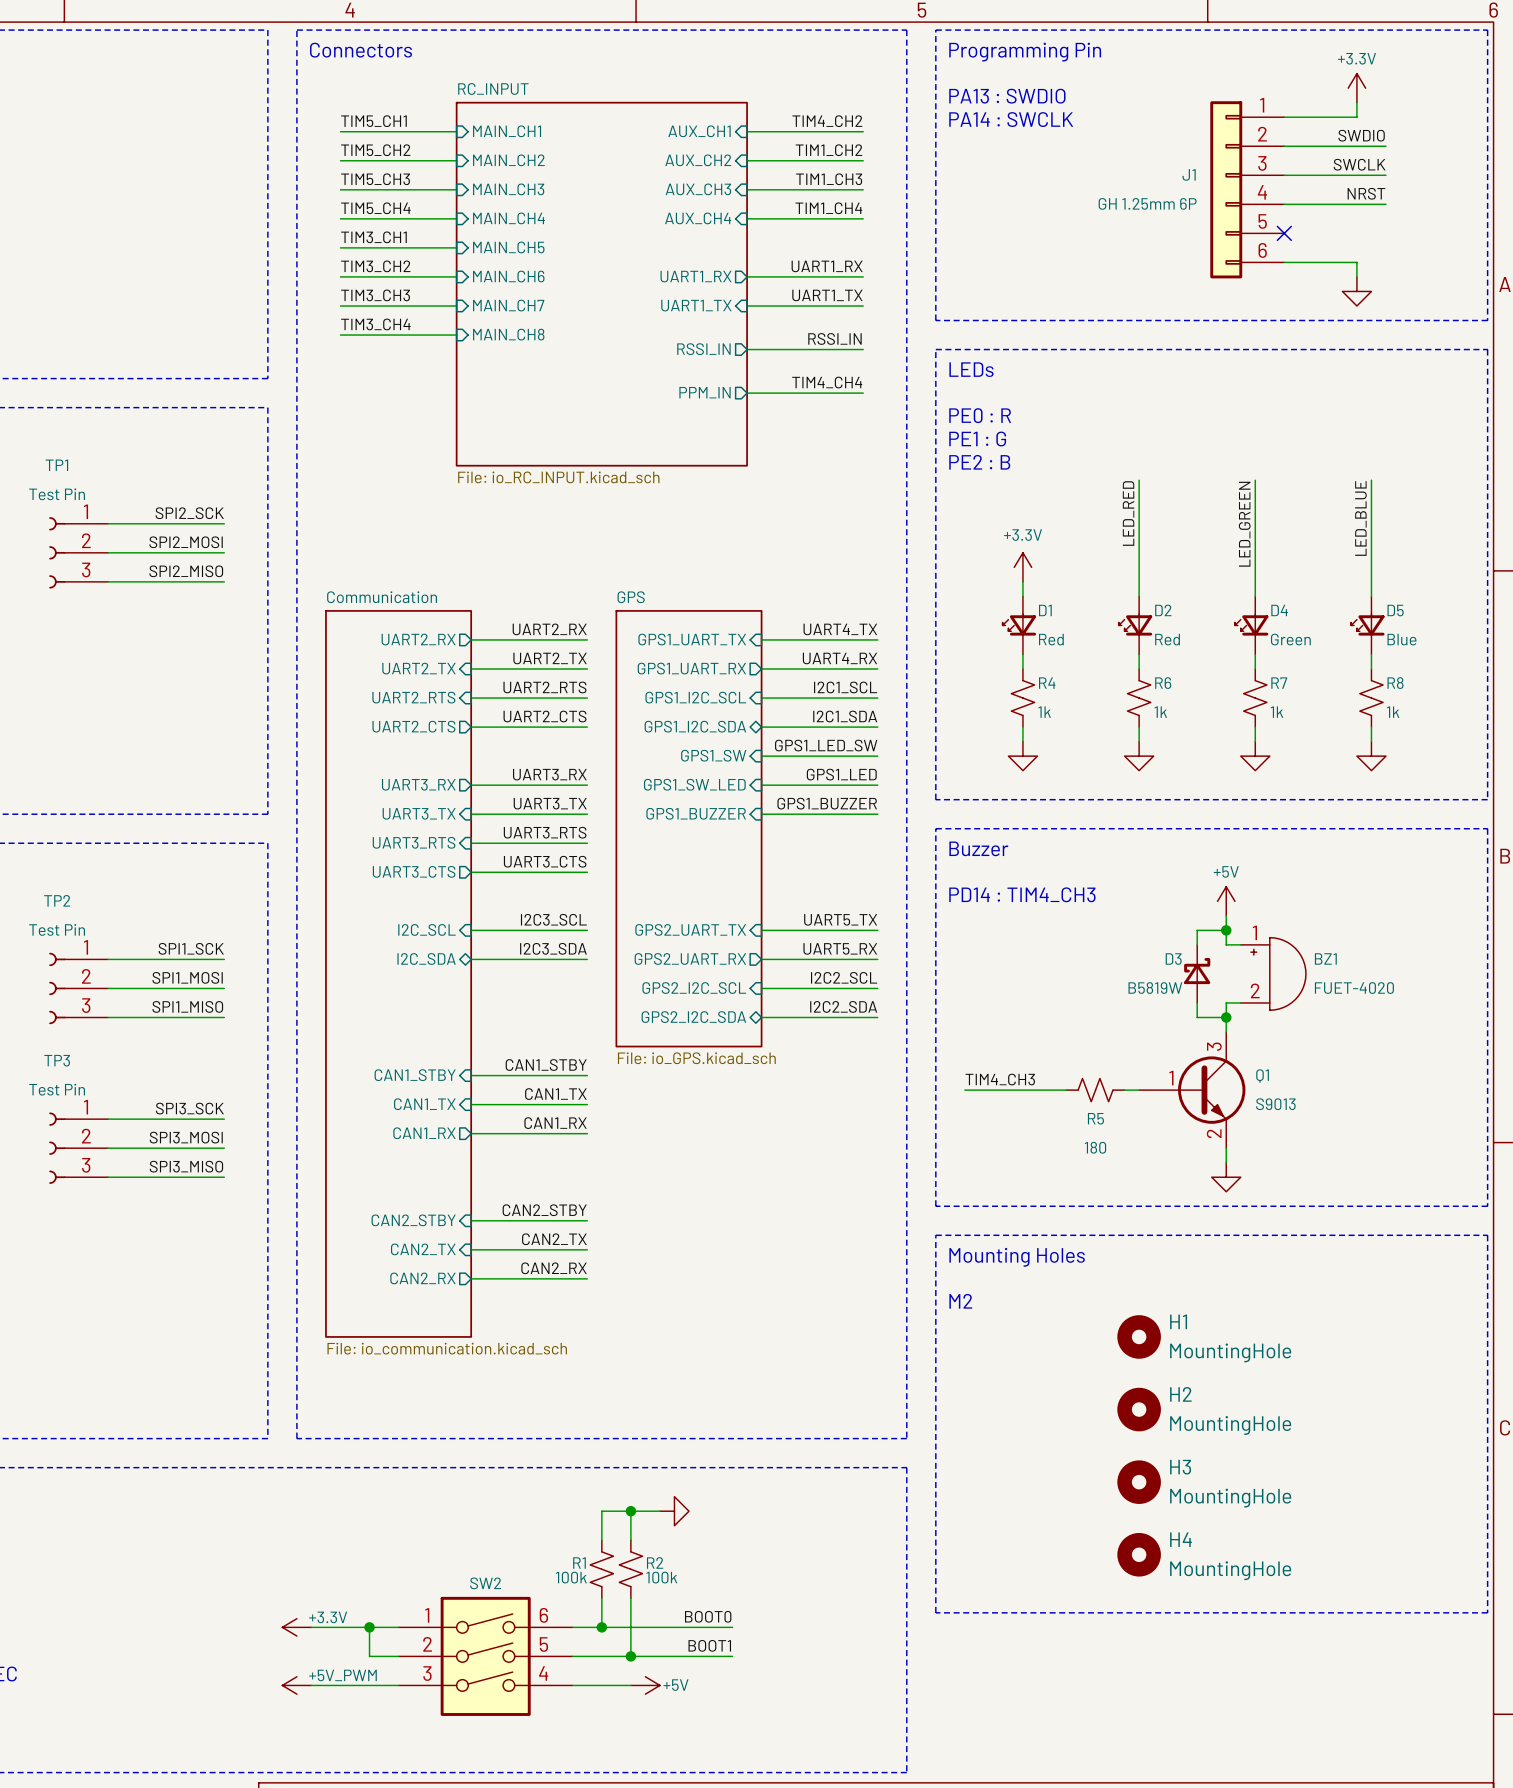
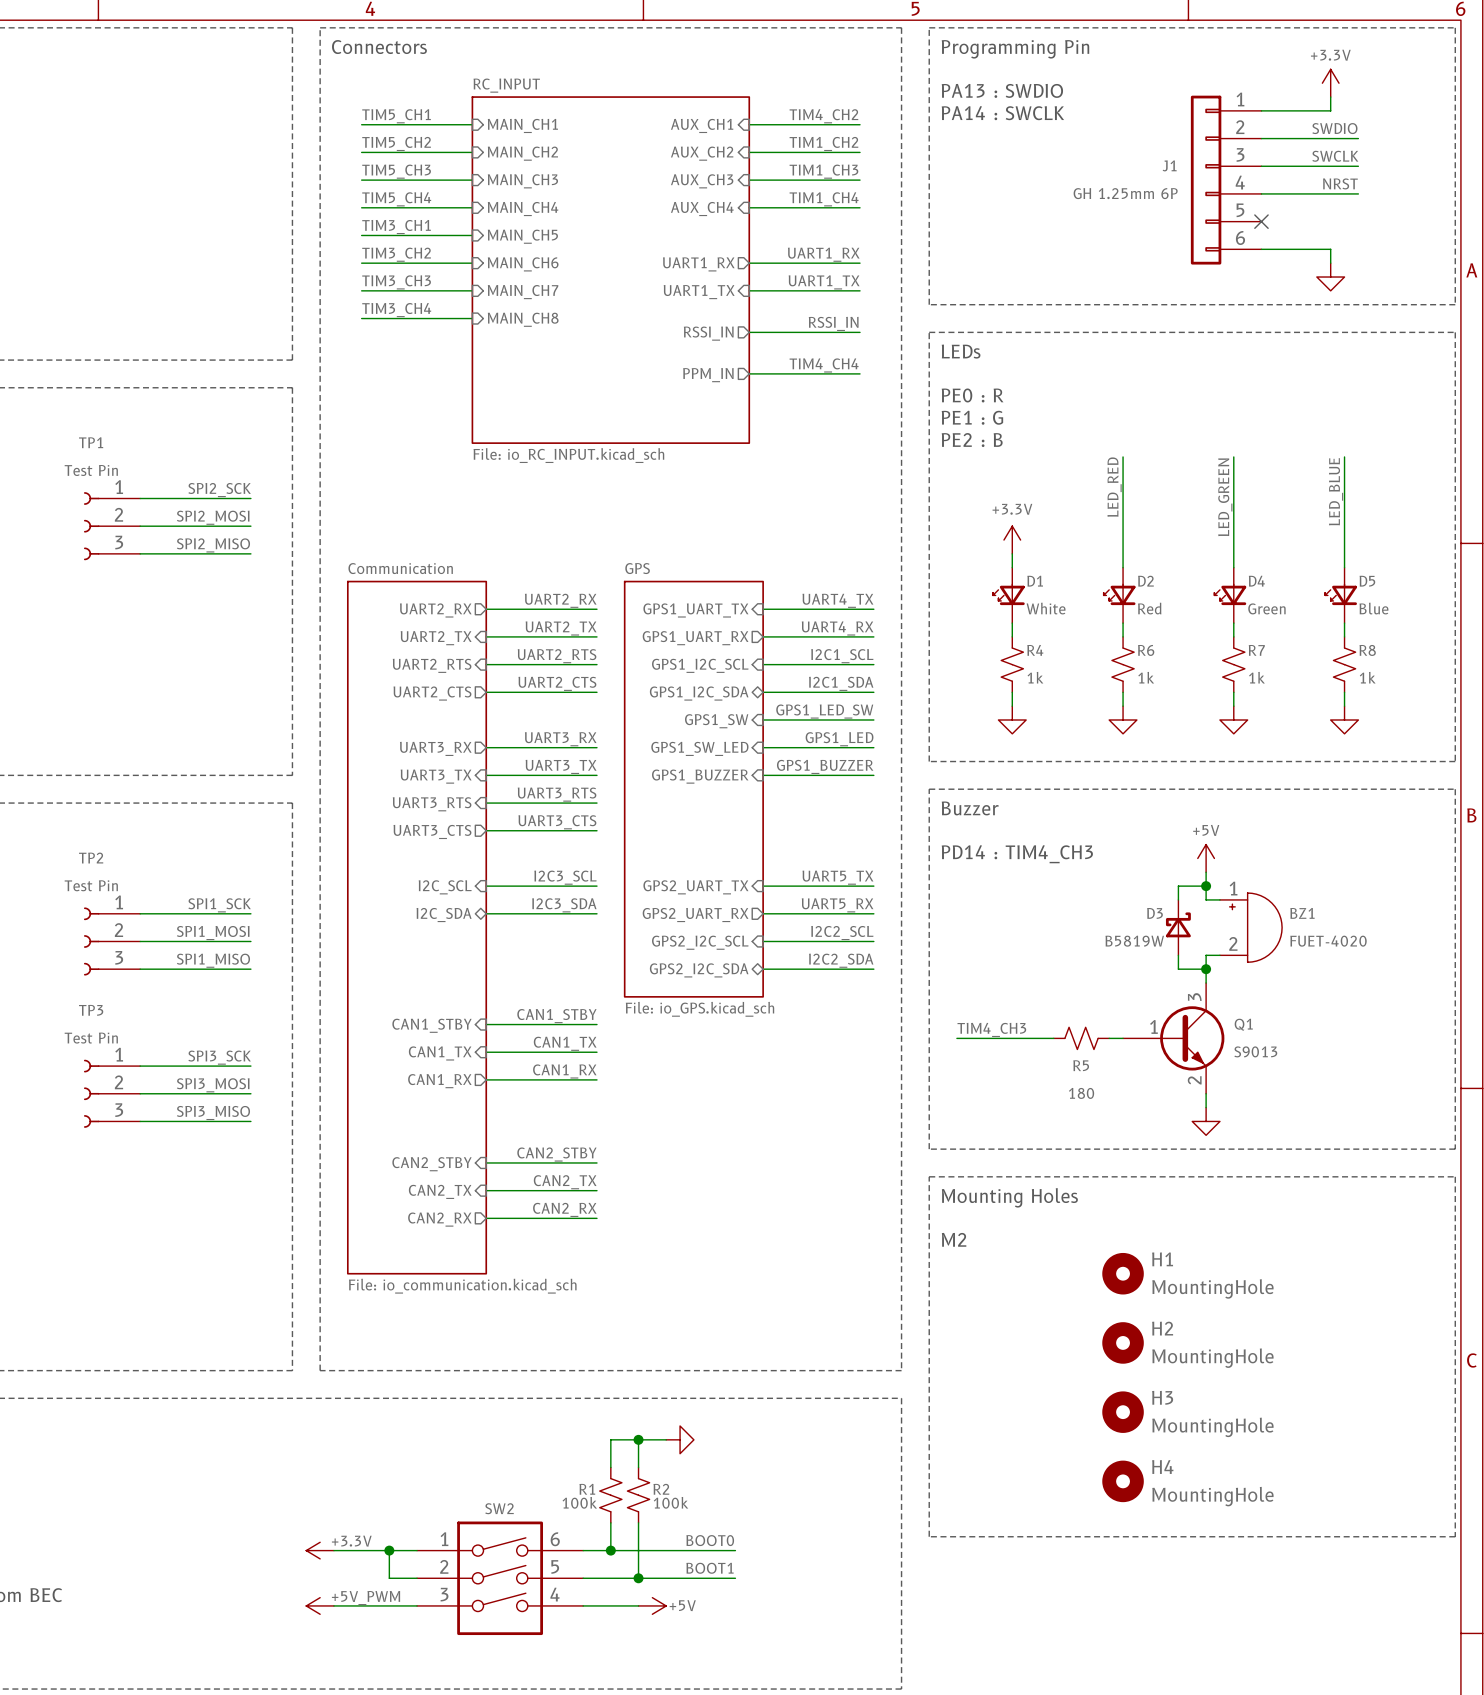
D1 value: Red (1051, 639) -> White (1046, 608)

